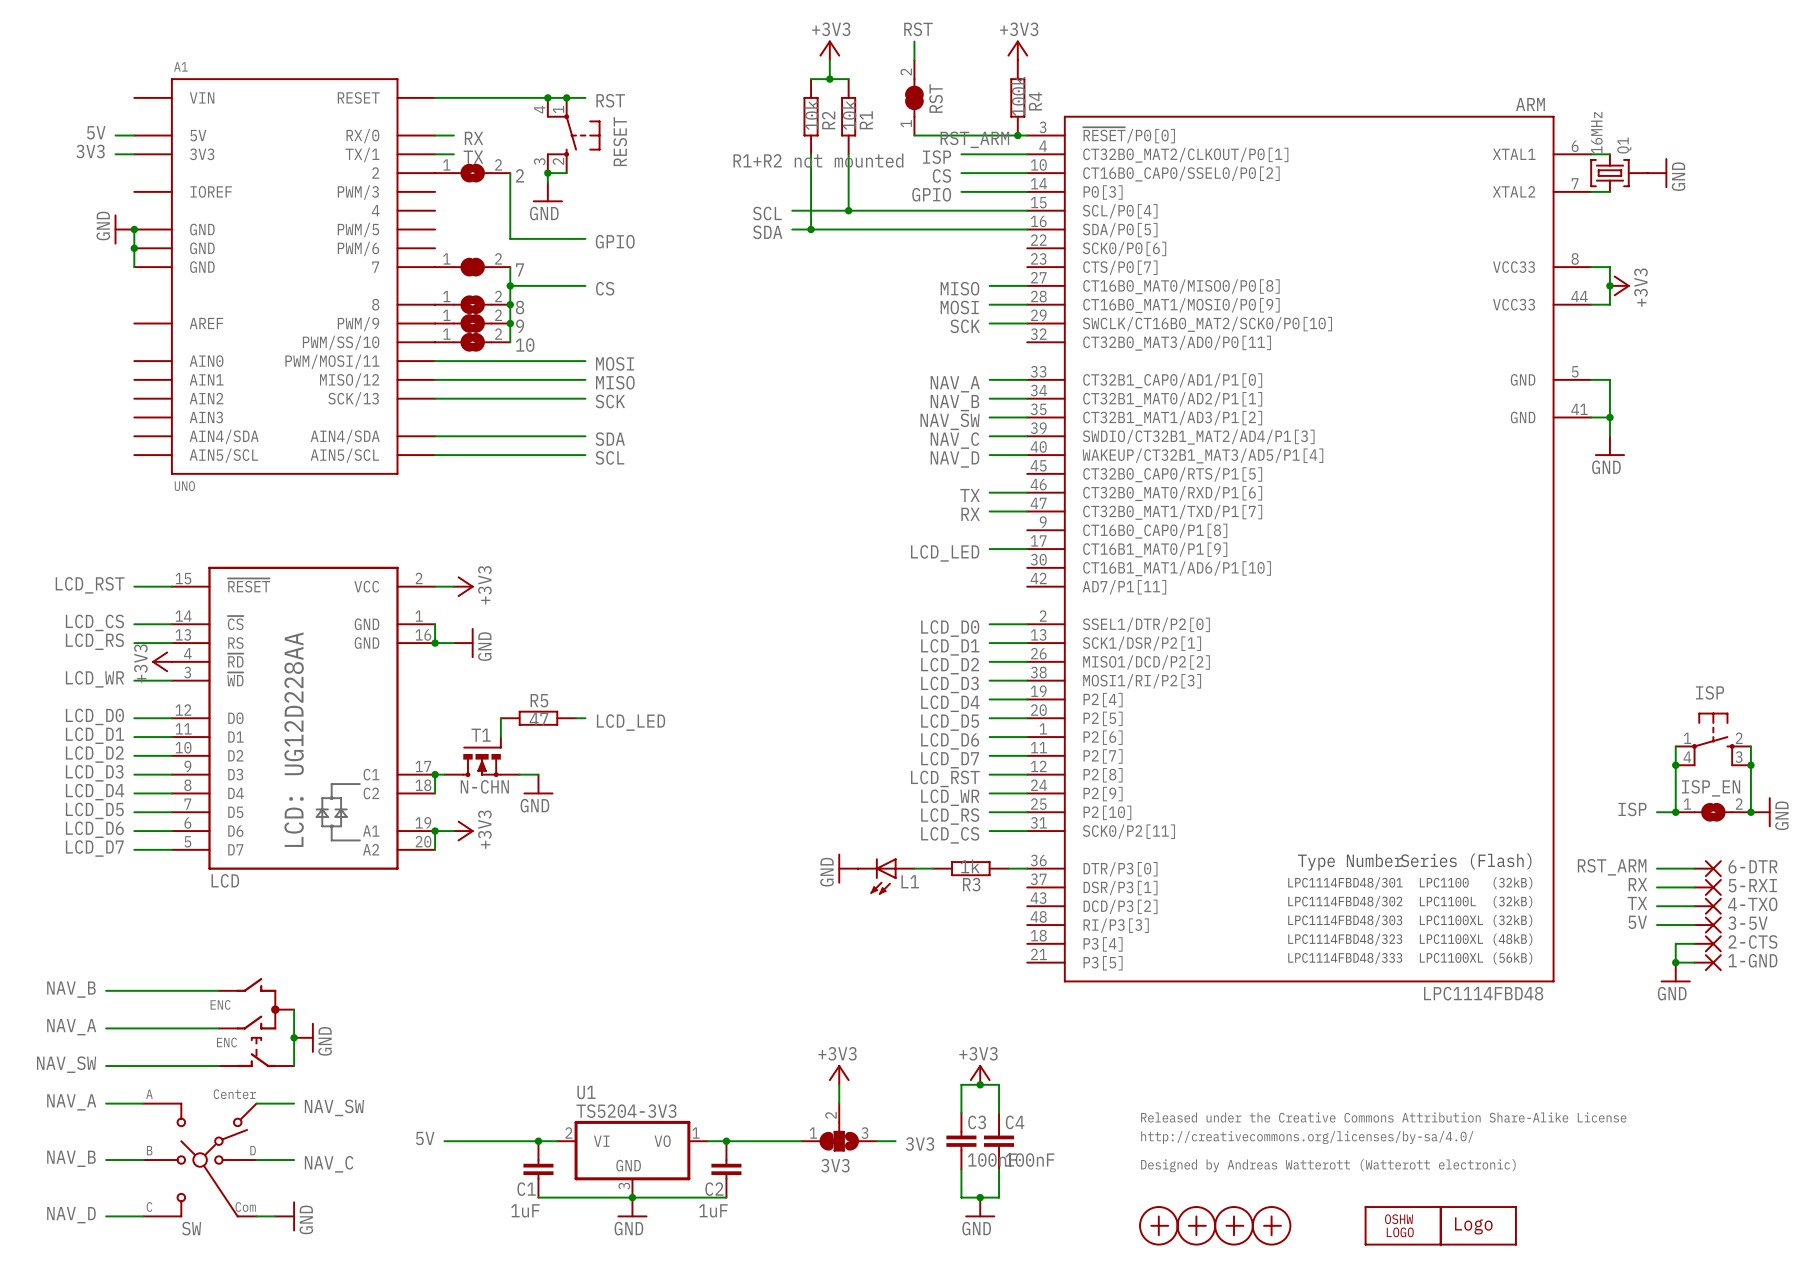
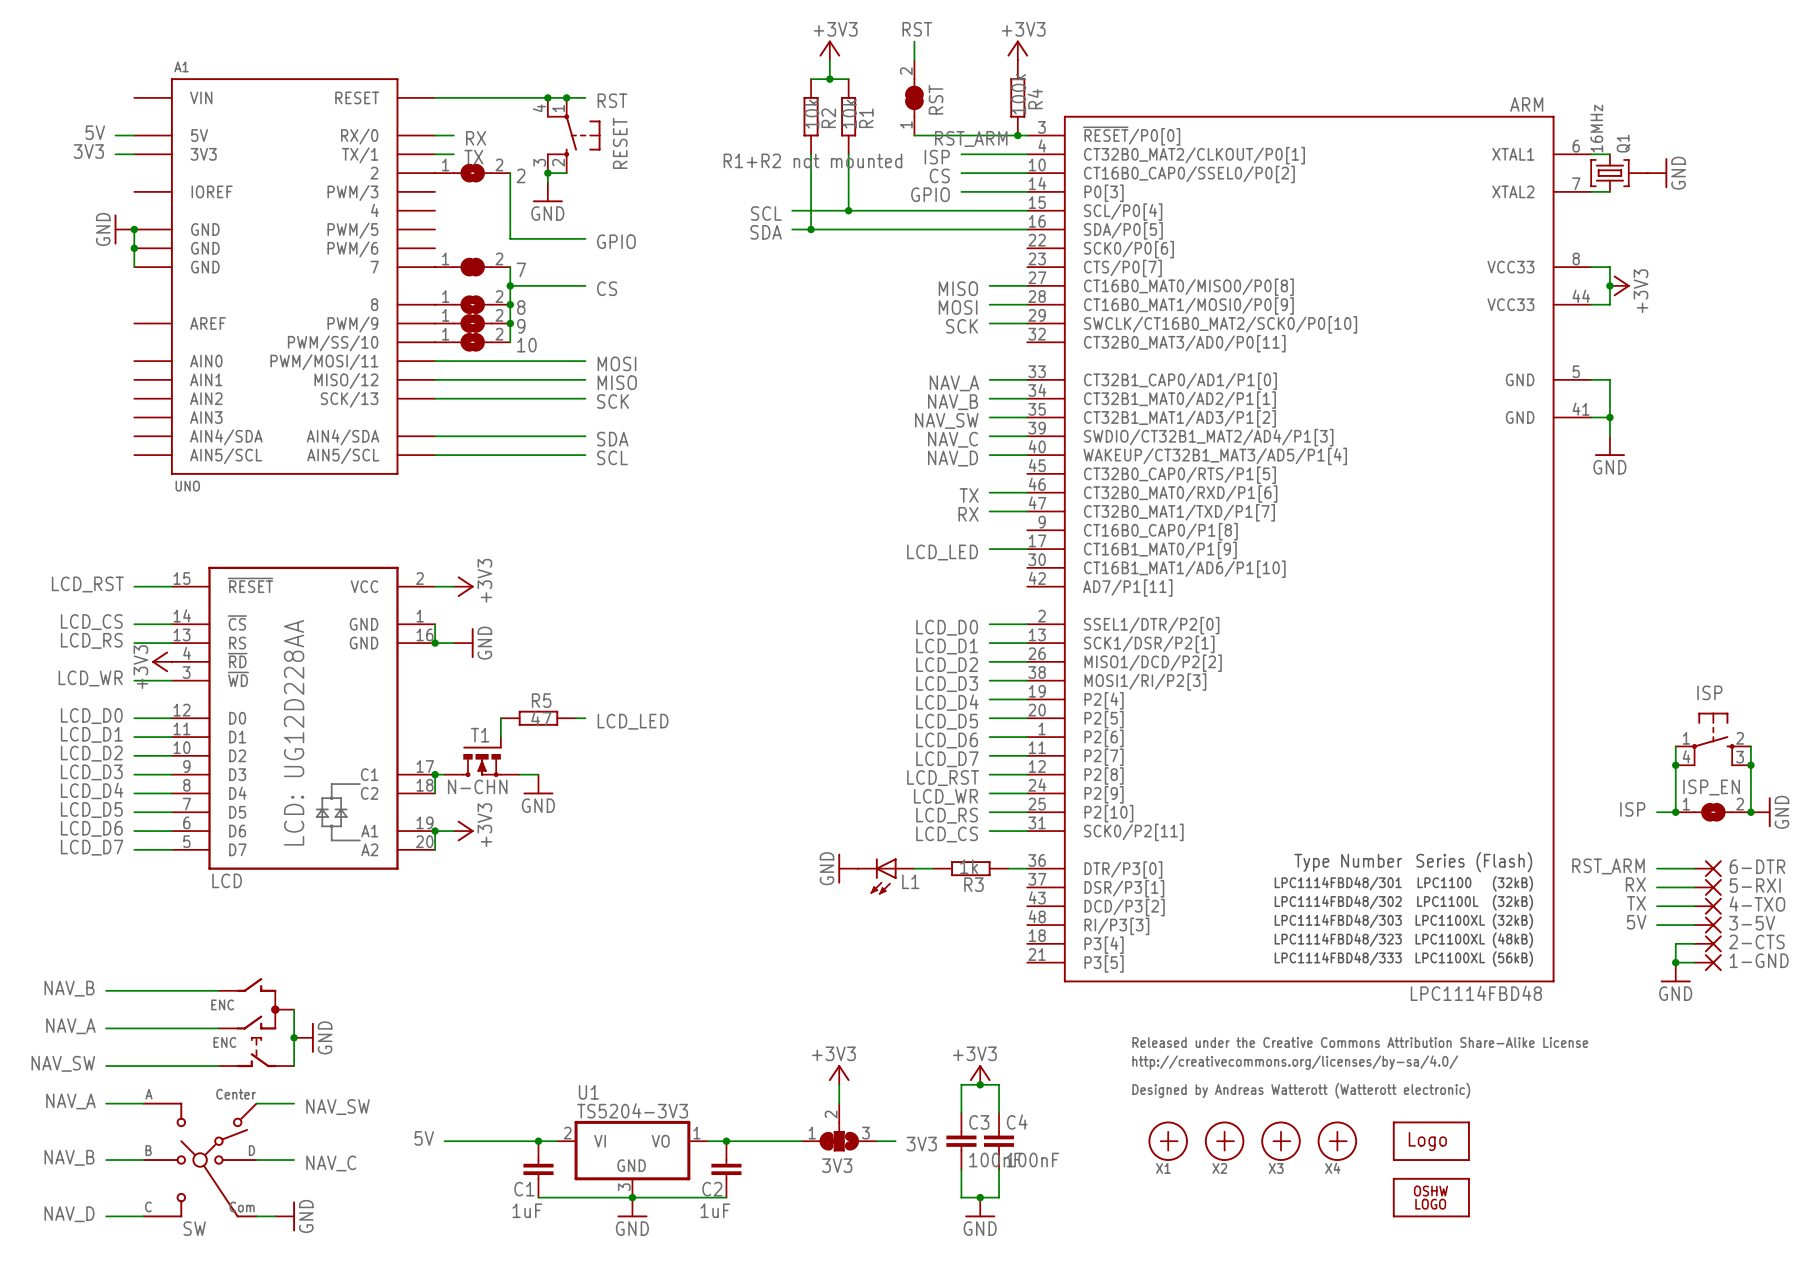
text position: Released under the Creative Commons Attribution Share-Alike License (1383, 1117) -> Released under the Creative Commons Attribution Share-Alike License (1360, 1042)
text position: http://creativecommons.org/licenses/by-sa/4.0/ (1307, 1137) -> http://creativecommons.org/licenses/by-sa/4.0/ (1295, 1062)
X1: none -> (1168, 1141)
X2: none -> (1224, 1141)
X3: none -> (1280, 1141)
X4: none -> (1337, 1141)
text position: Designed by Andreas Watterott (Watterott electronic) (1328, 1165) -> Designed by Andreas Watterott (Watterott electronic) (1301, 1090)
part: (1158, 1225) -> none
part: (1196, 1225) -> none
part: (1233, 1225) -> none
part: (1271, 1225) -> none
part position: (1403, 1225) -> (1431, 1197)
part position: (1478, 1225) -> (1431, 1141)

